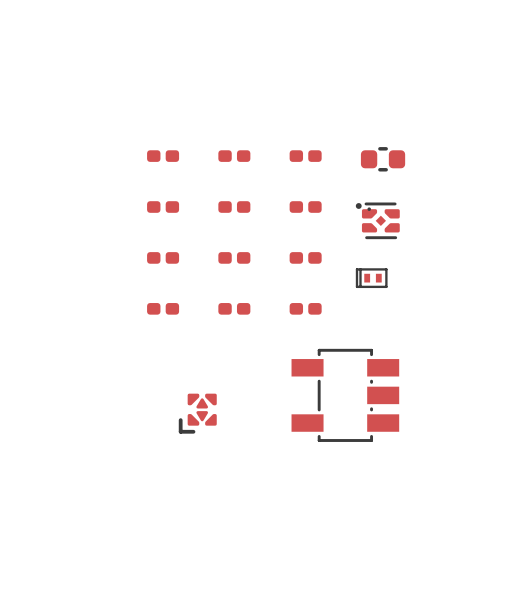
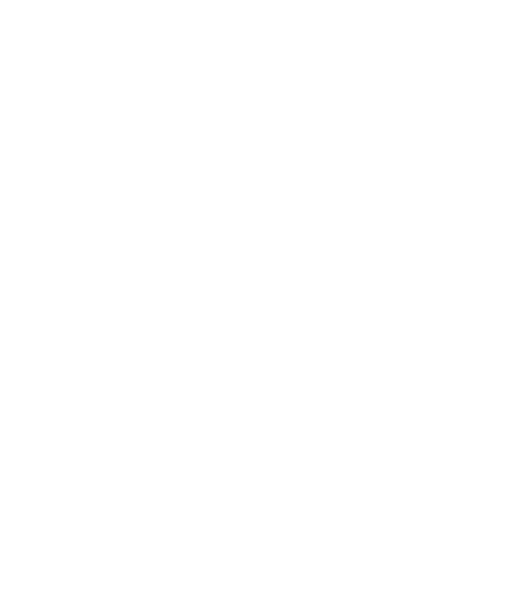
part: (163, 156) -> none
part: (234, 156) -> none
part: (305, 156) -> none
part: (383, 159) -> none
part: (163, 207) -> none
part: (234, 207) -> none
part: (305, 207) -> none
part: (377, 220) -> none
part: (163, 257) -> none
part: (234, 257) -> none
part: (305, 257) -> none
part: (371, 278) -> none
part: (163, 308) -> none
part: (234, 308) -> none
part: (305, 308) -> none
part: (345, 395) -> none
part: (197, 413) -> none

